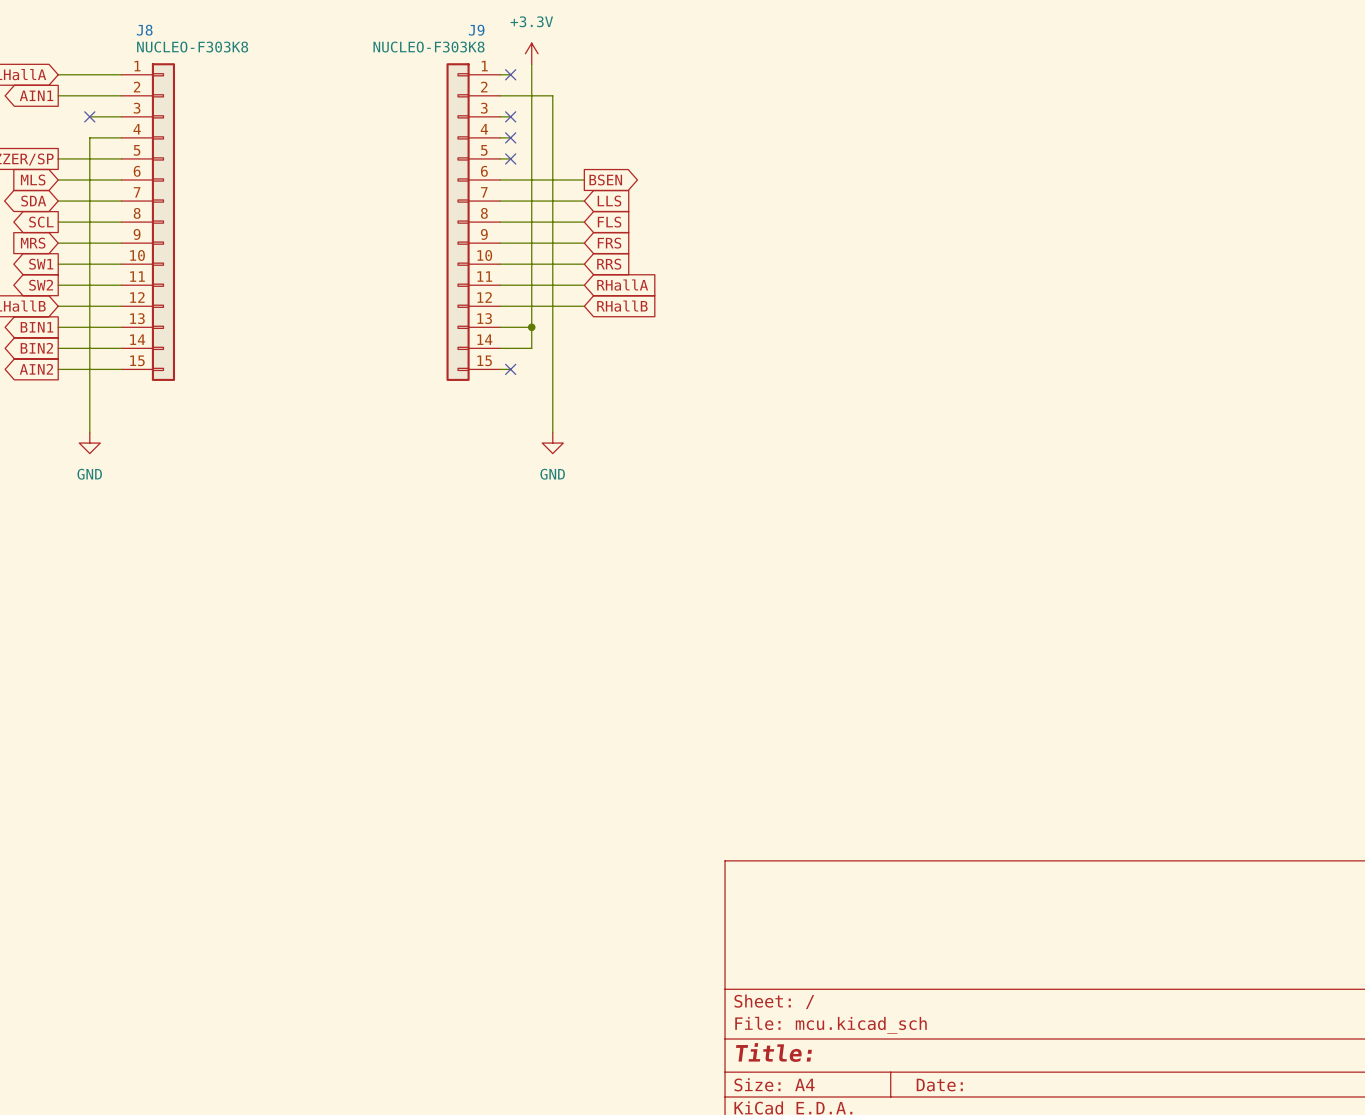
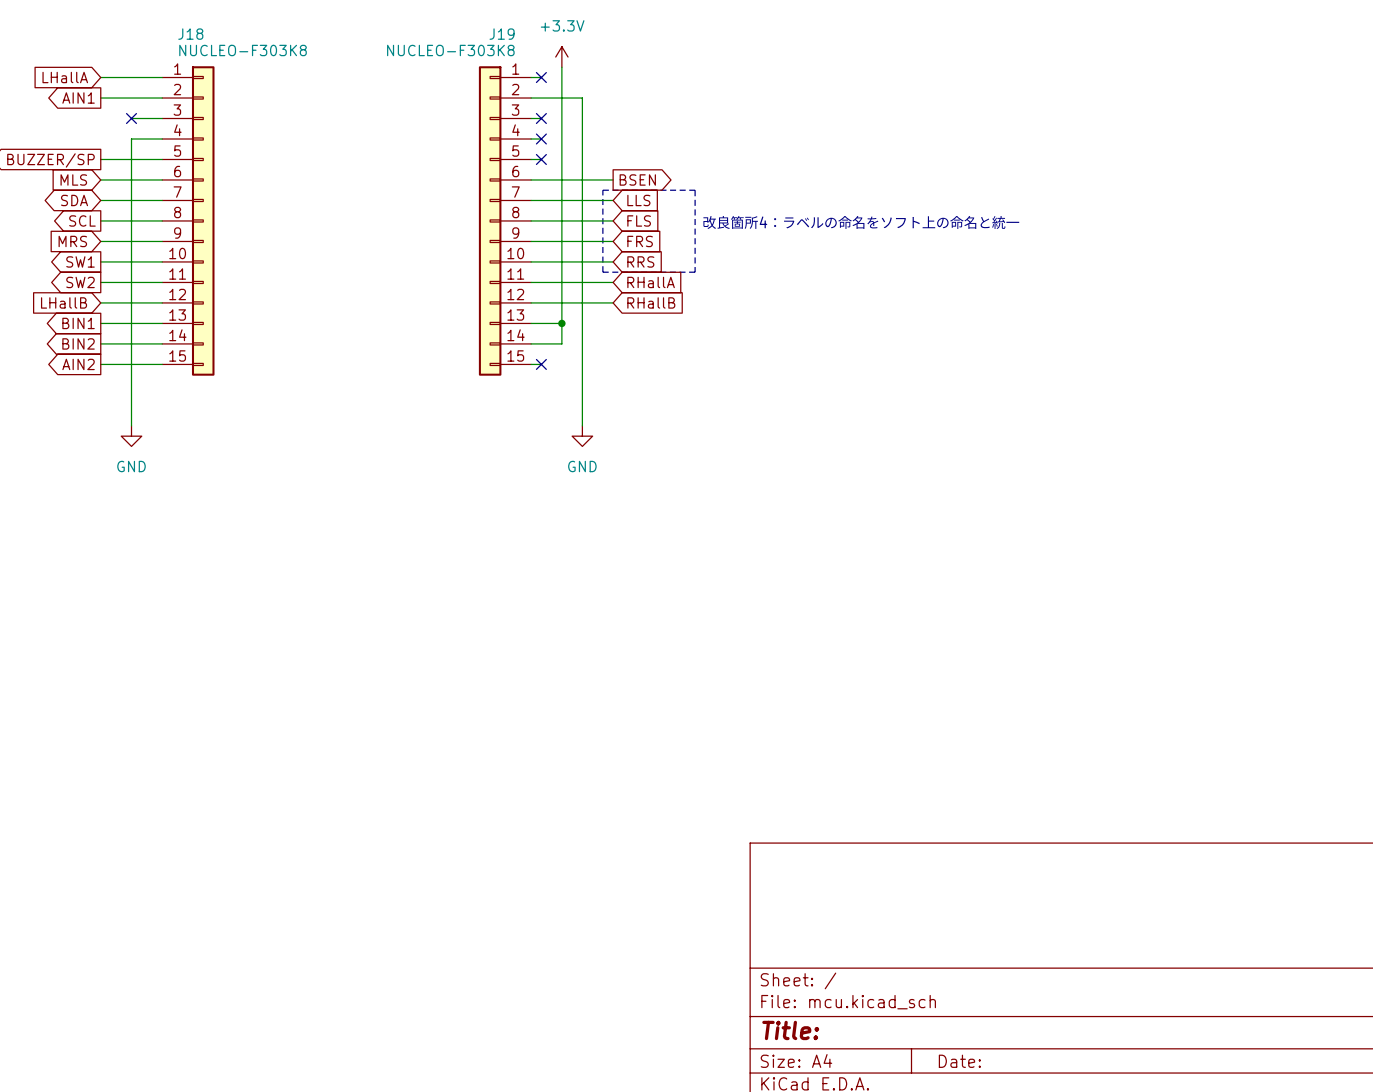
J8 name: J8 (144, 30) -> J18 (190, 34)
J9 name: J9 (476, 30) -> J19 (502, 34)
line: none -> (602, 190) (695, 190) (695, 272) (602, 272) (602, 190)
text: none -> 改良箇所4：ラベルの命名をソフト上の命名と統一 (861, 222)

